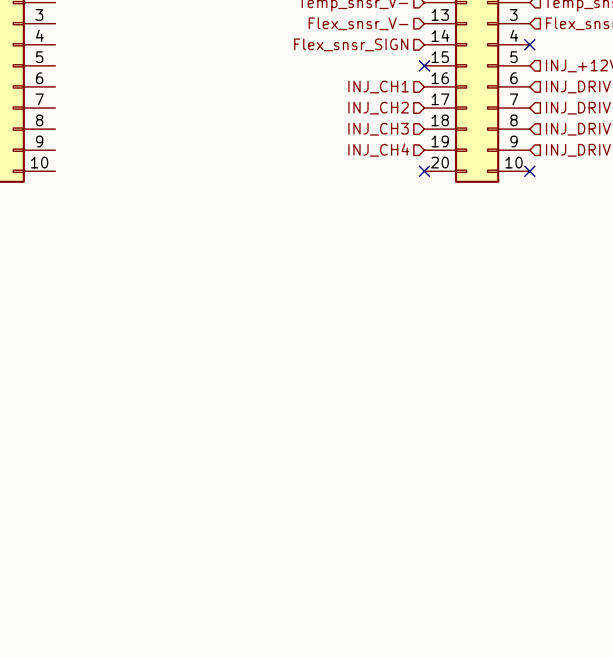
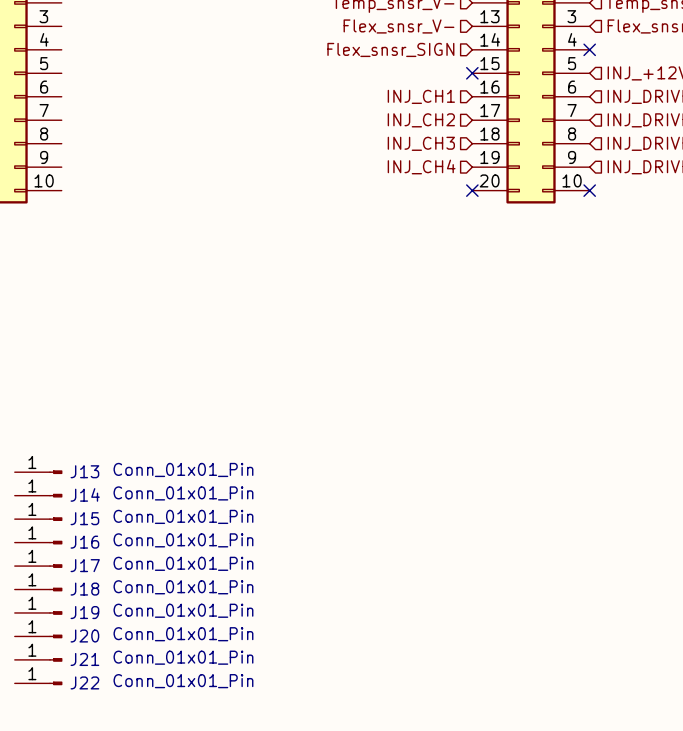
J13: none -> Conn_01x01_Pin (38, 472)
J14: none -> Conn_01x01_Pin (38, 495)
J15: none -> Conn_01x01_Pin (38, 519)
J16: none -> Conn_01x01_Pin (38, 542)
J17: none -> Conn_01x01_Pin (38, 566)
J18: none -> Conn_01x01_Pin (38, 589)
J19: none -> Conn_01x01_Pin (38, 612)
J20: none -> Conn_01x01_Pin (38, 636)
J21: none -> Conn_01x01_Pin (38, 659)
J22: none -> Conn_01x01_Pin (38, 683)

